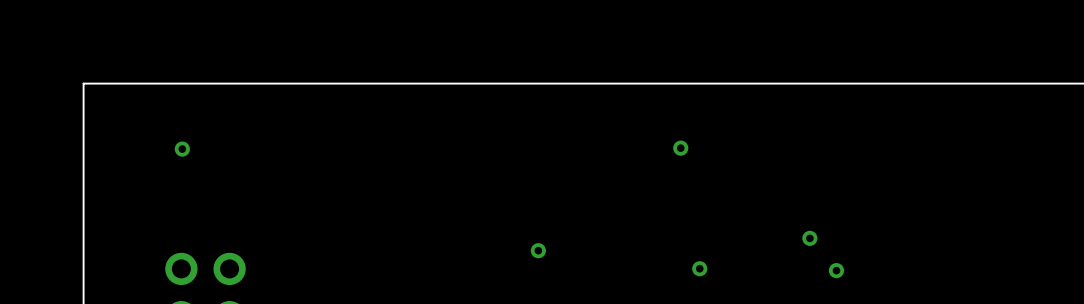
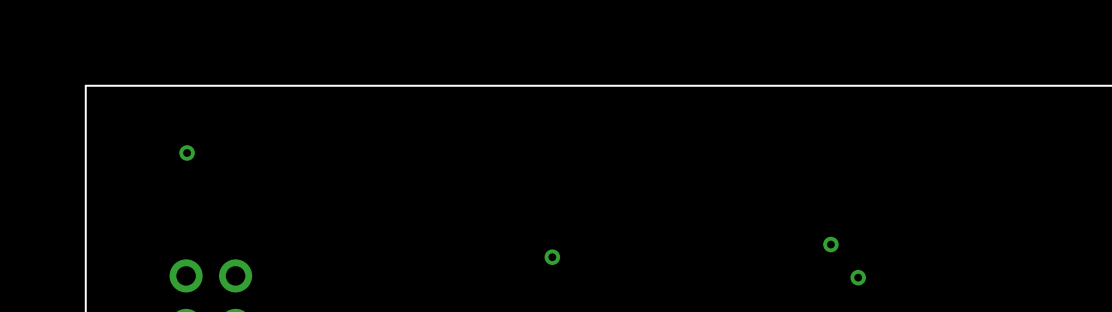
via: (680, 148) -> none
via: (699, 268) -> none

